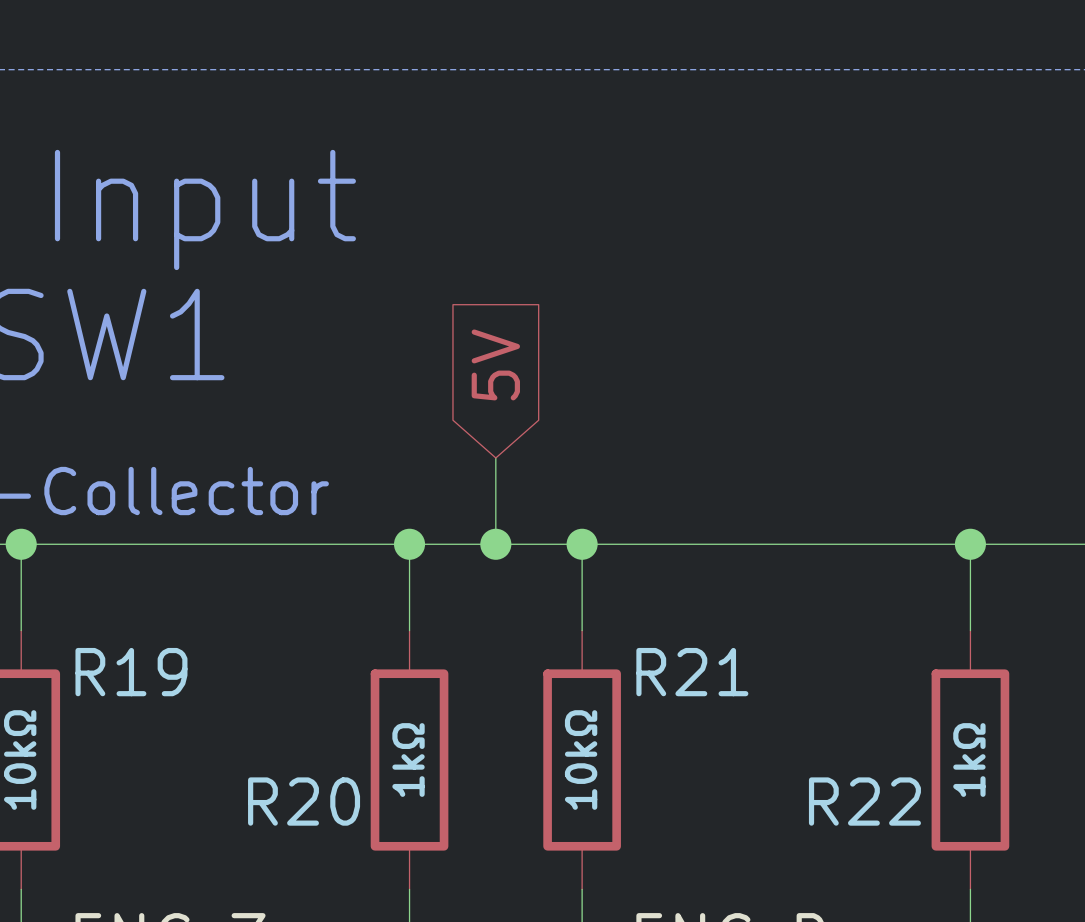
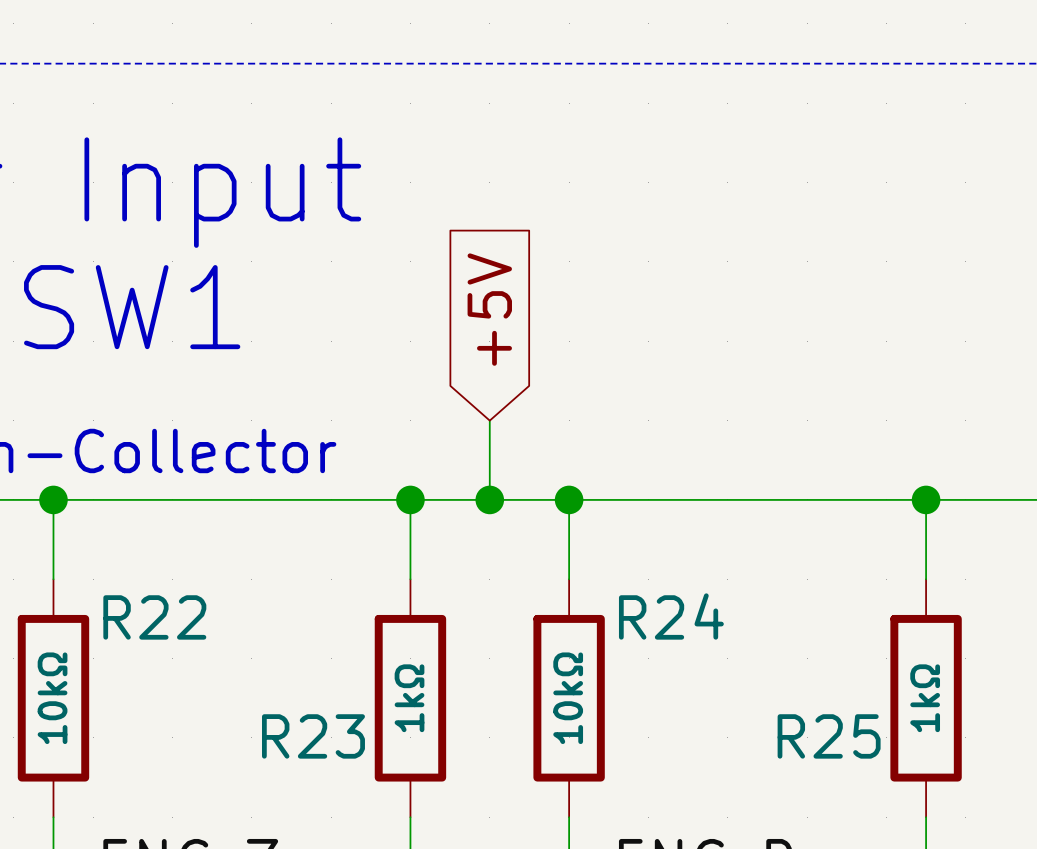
global label: 5V (495, 364) -> +5V (489, 309)
R19 name: R19 (131, 672) -> R22 (154, 617)
R21 name: R21 (692, 672) -> R24 (671, 616)
R20 name: R20 (304, 801) -> R23 (313, 736)
R22 name: R22 (864, 801) -> R25 (829, 736)

